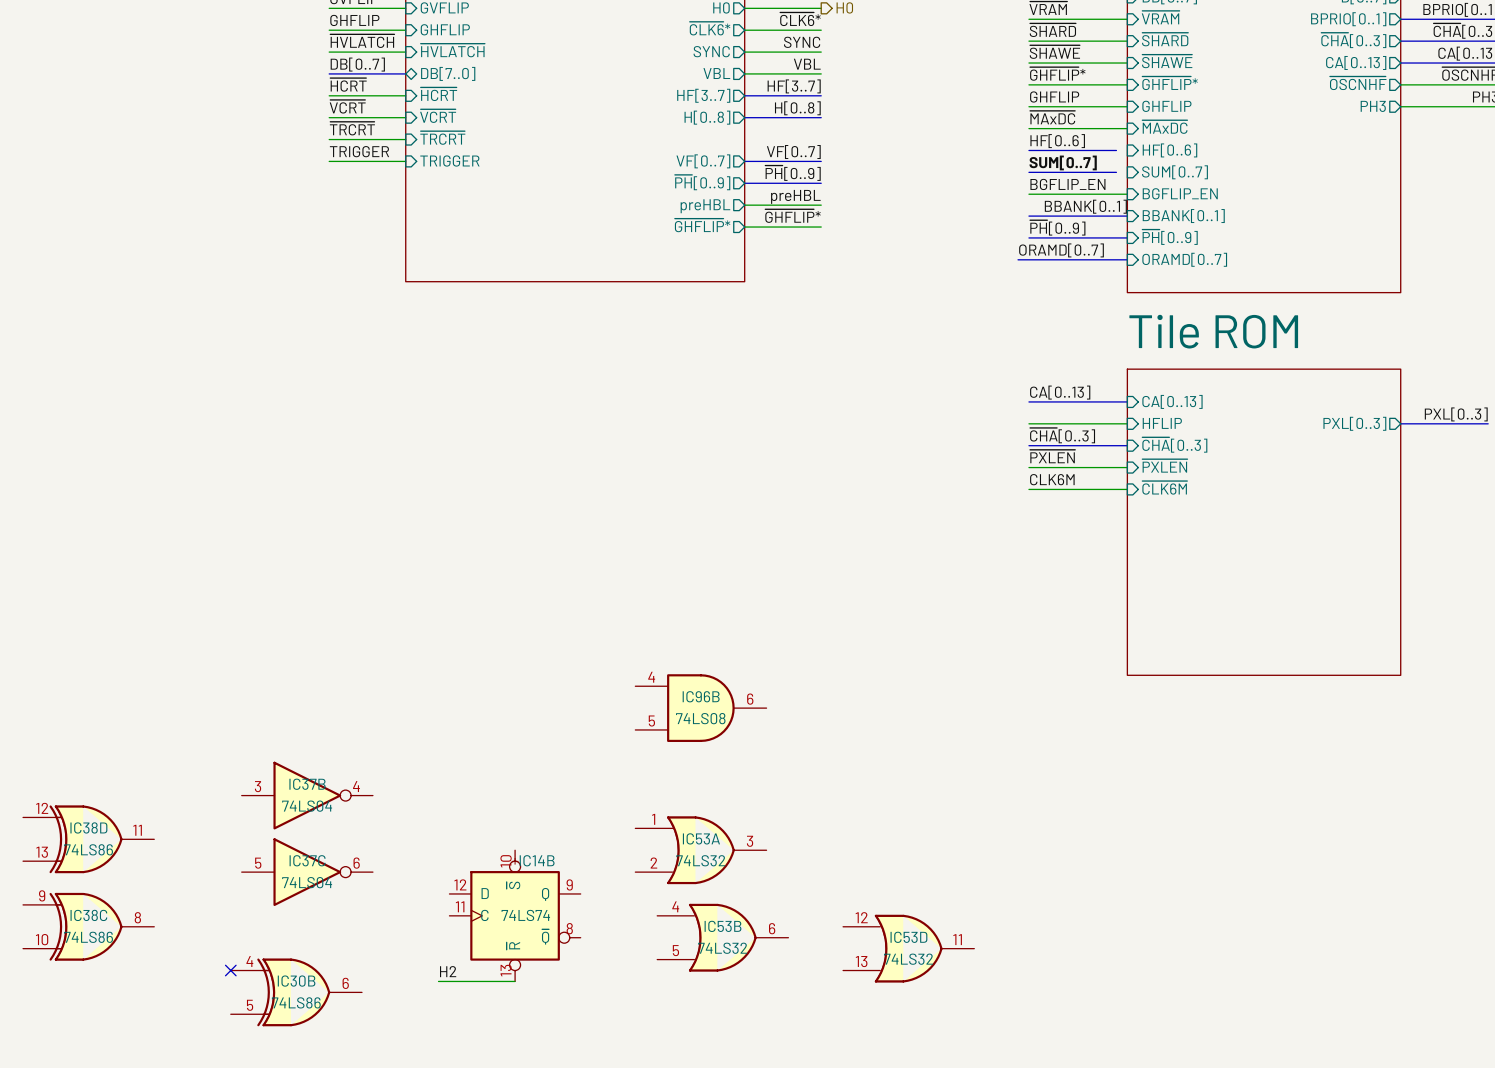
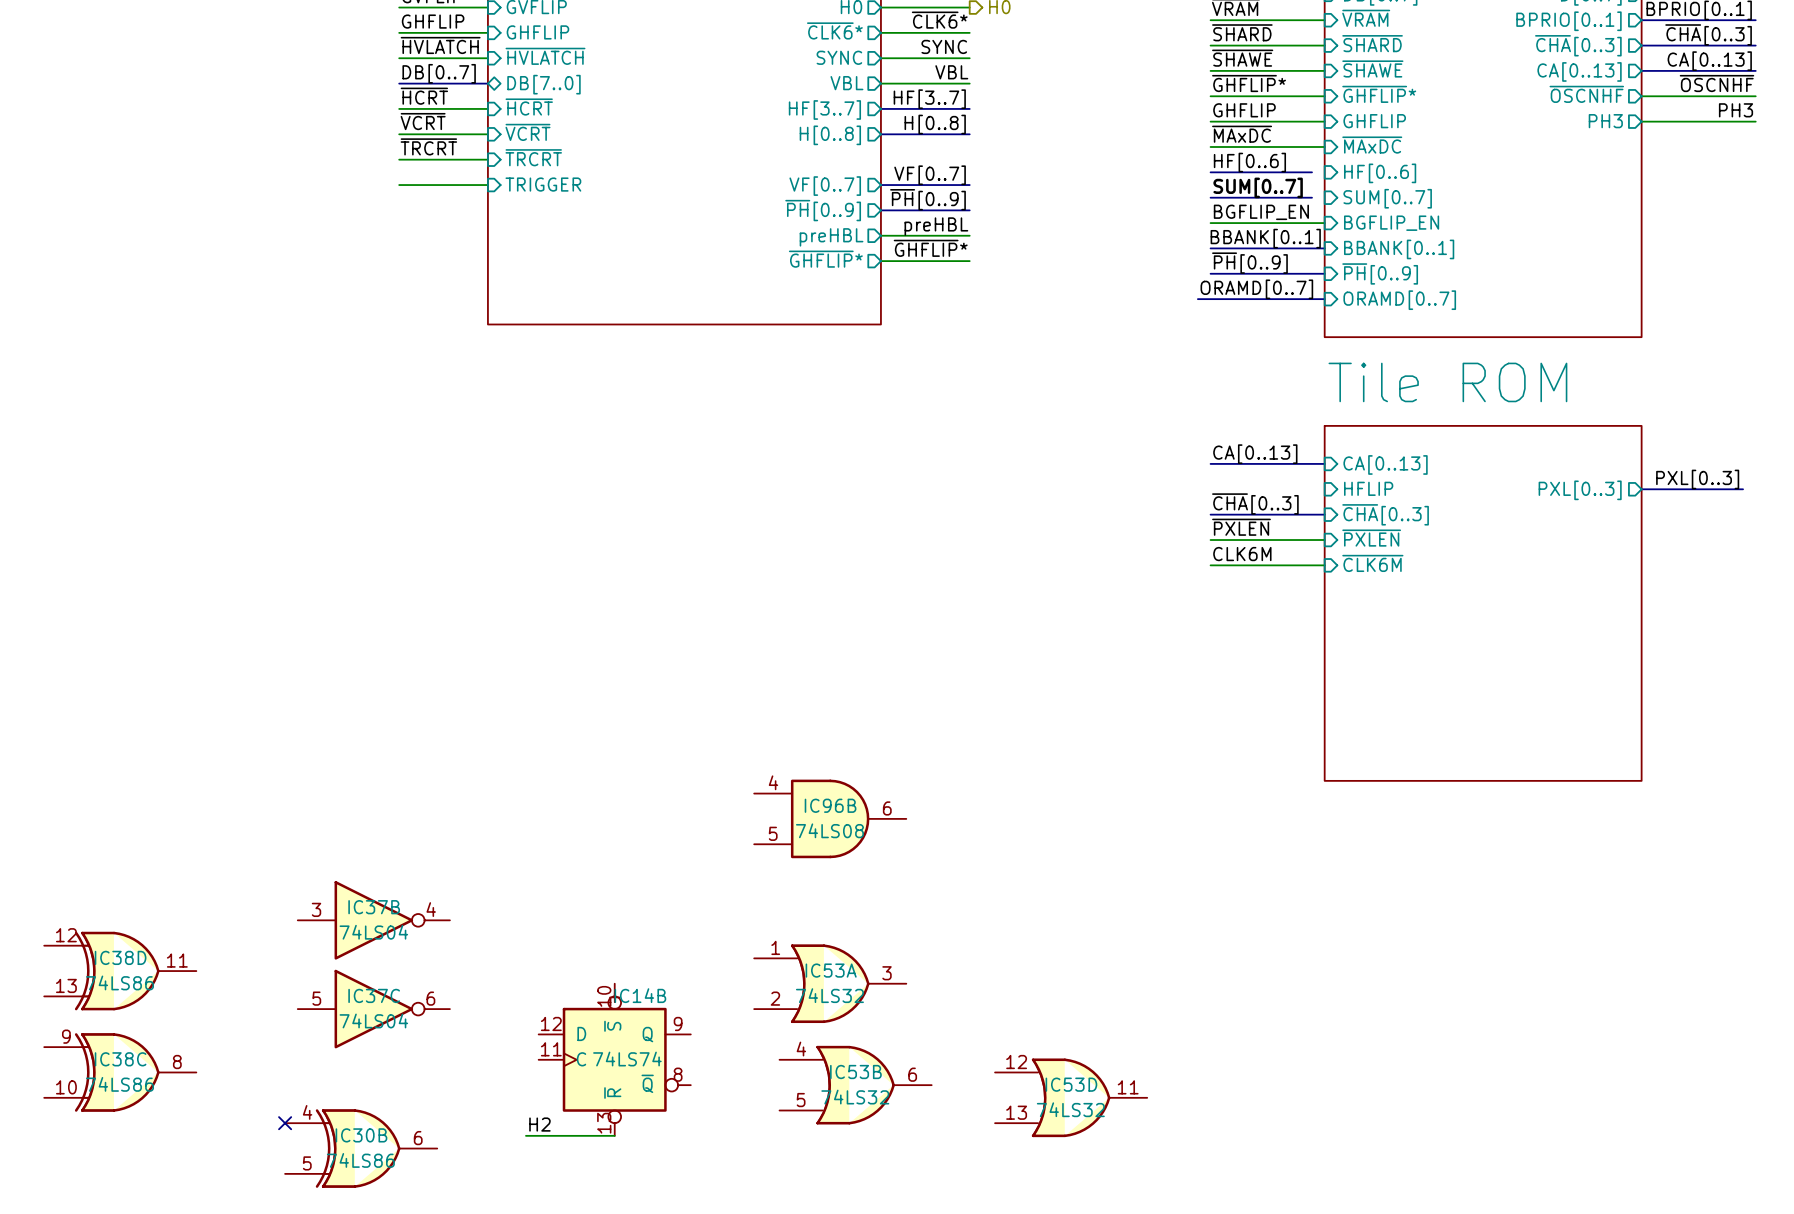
label: TRIGGER (359, 151) -> none
wire: (1028, 423) (1127, 423) -> none

